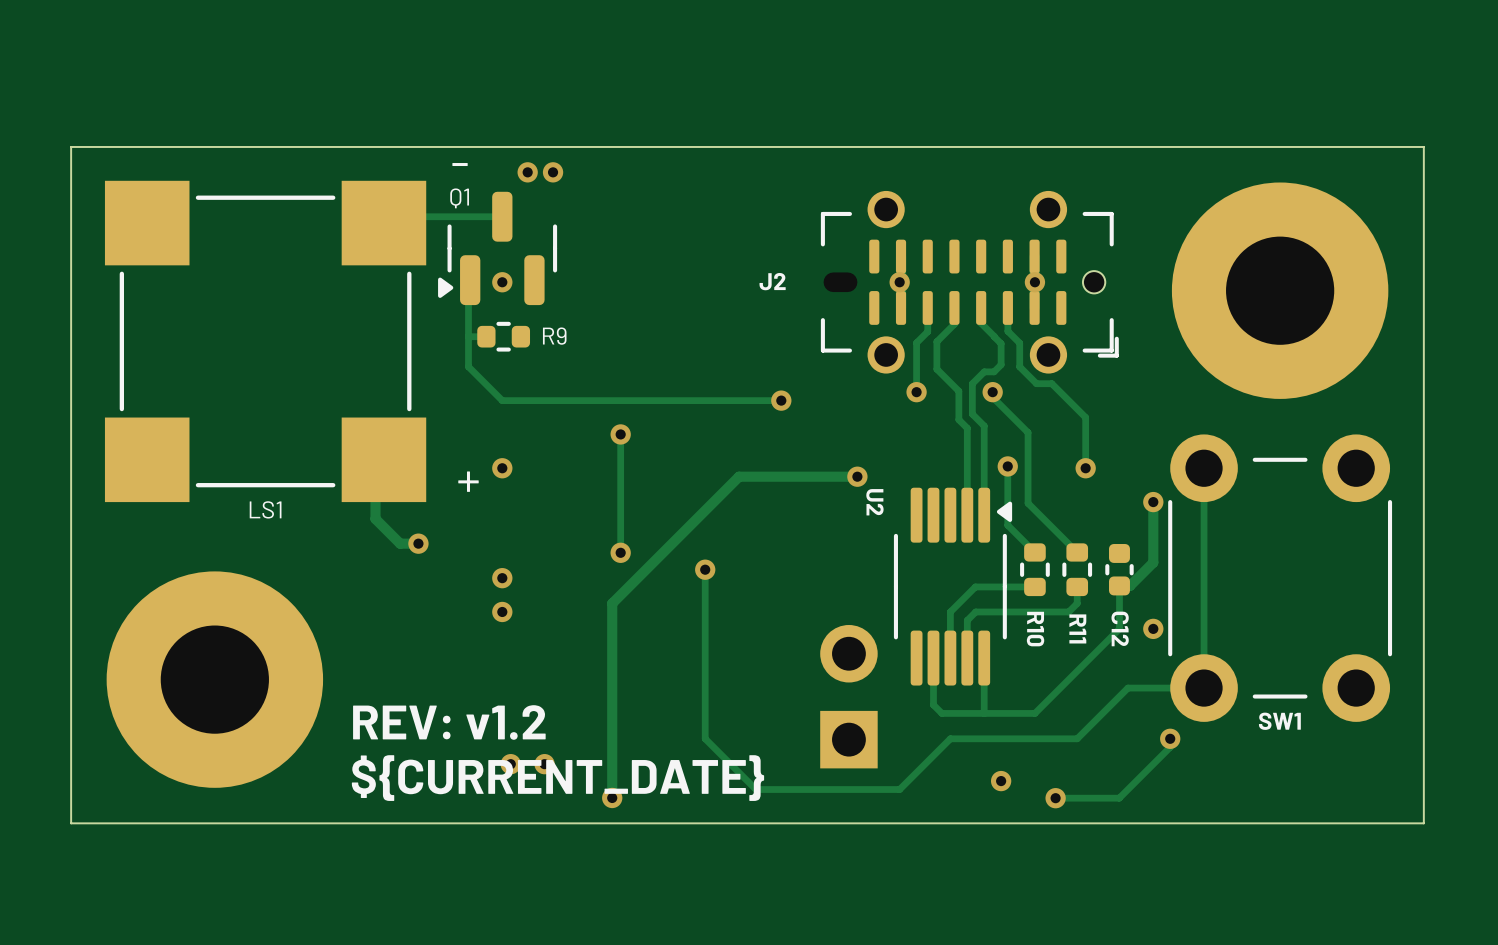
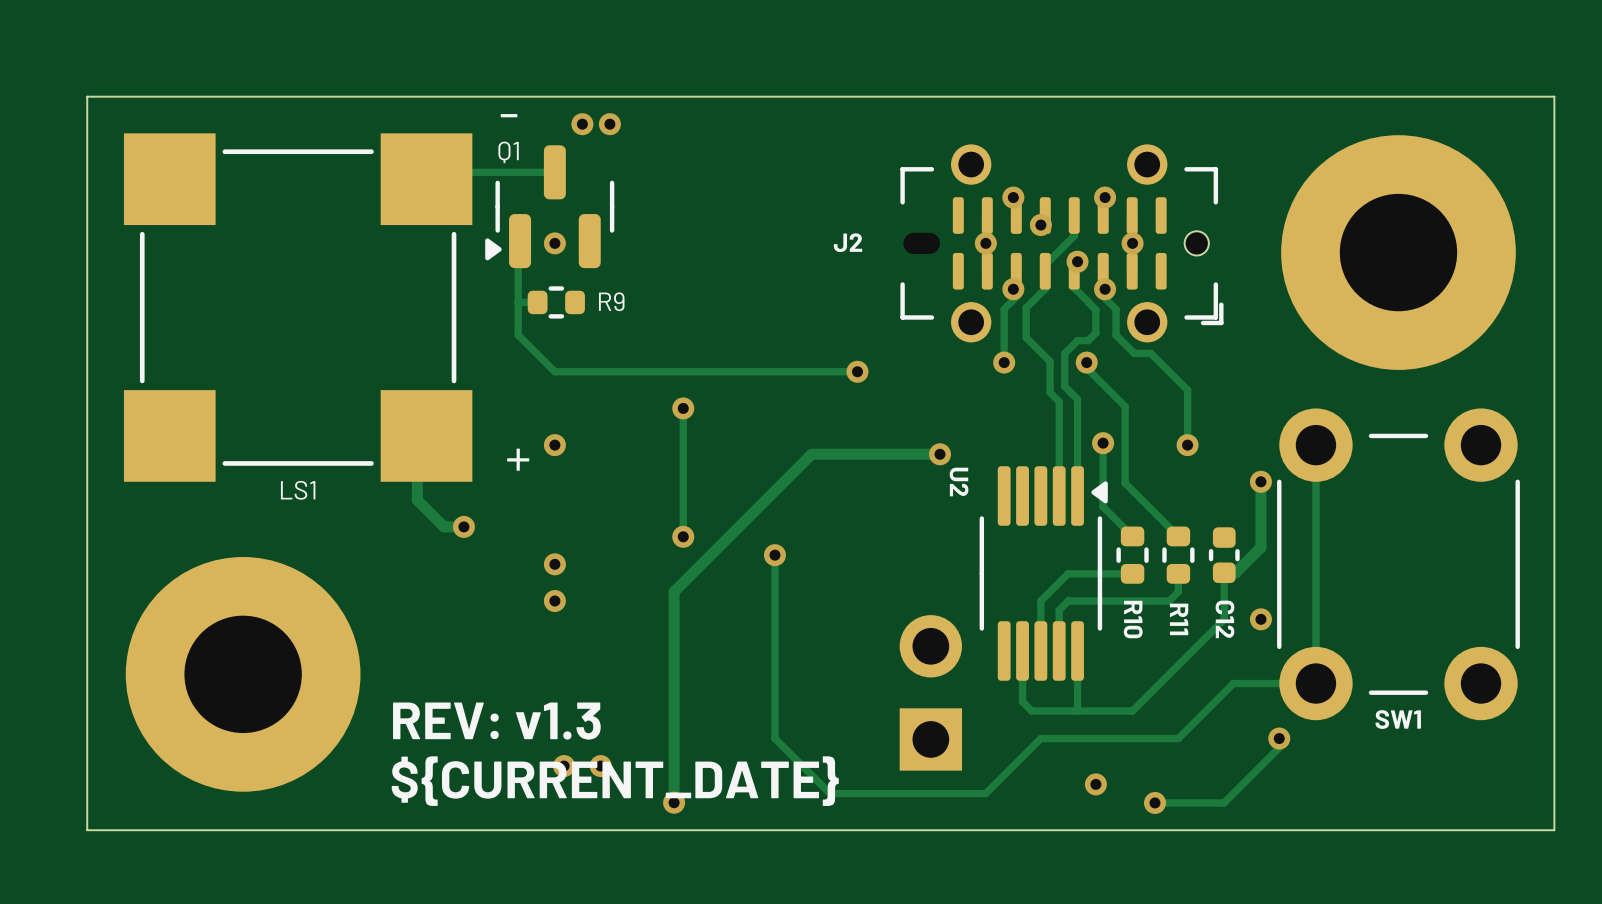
via: none -> (1013, 197)
via: none -> (1105, 197)
track: none -> (1074, 215) (1074, 235) (1045, 264)
via: none -> (1040, 225)
via: none -> (1077, 261)
via: none -> (1013, 289)
via: none -> (1105, 289)
text: REV: v1.2 (449, 722) -> REV: v1.3 (496, 721)

